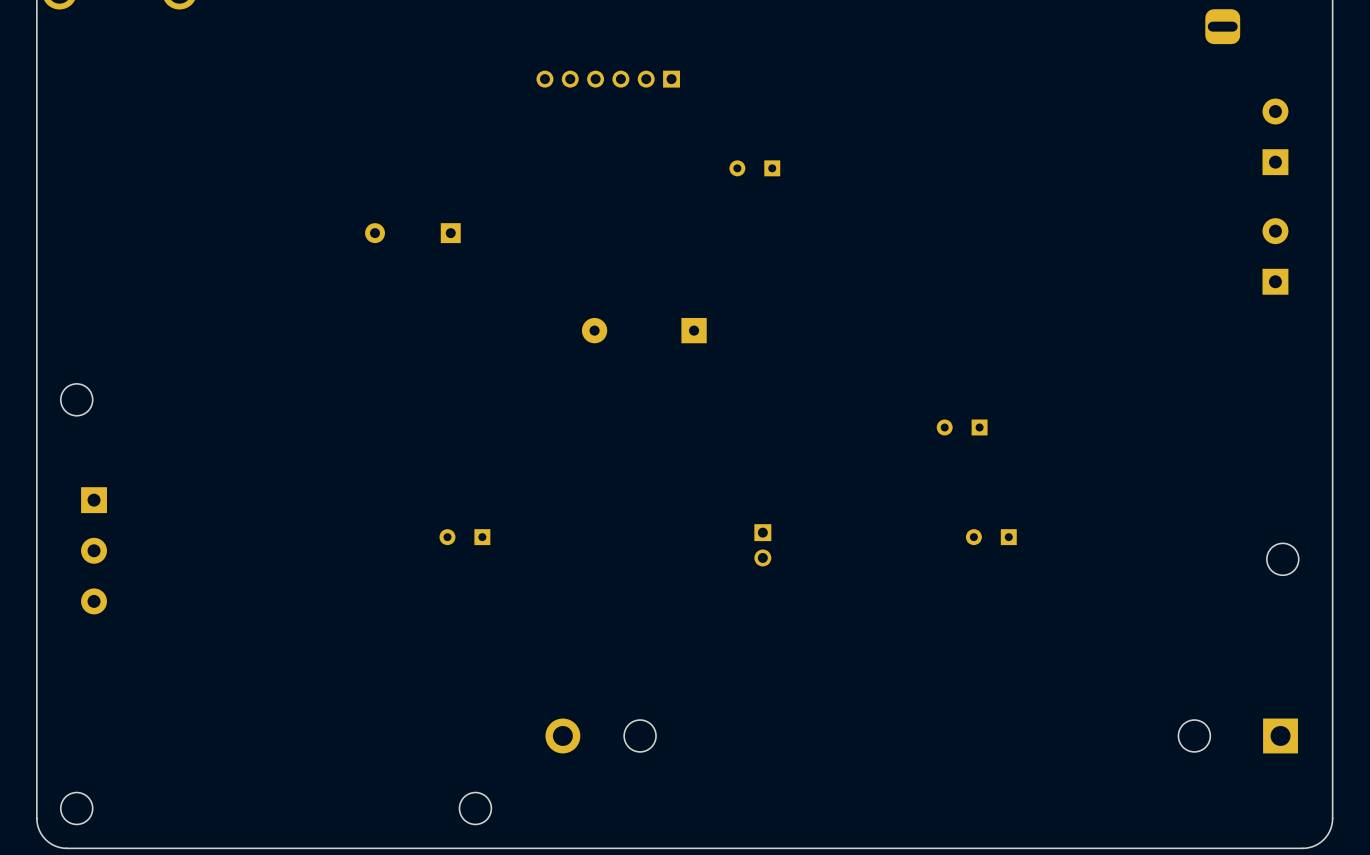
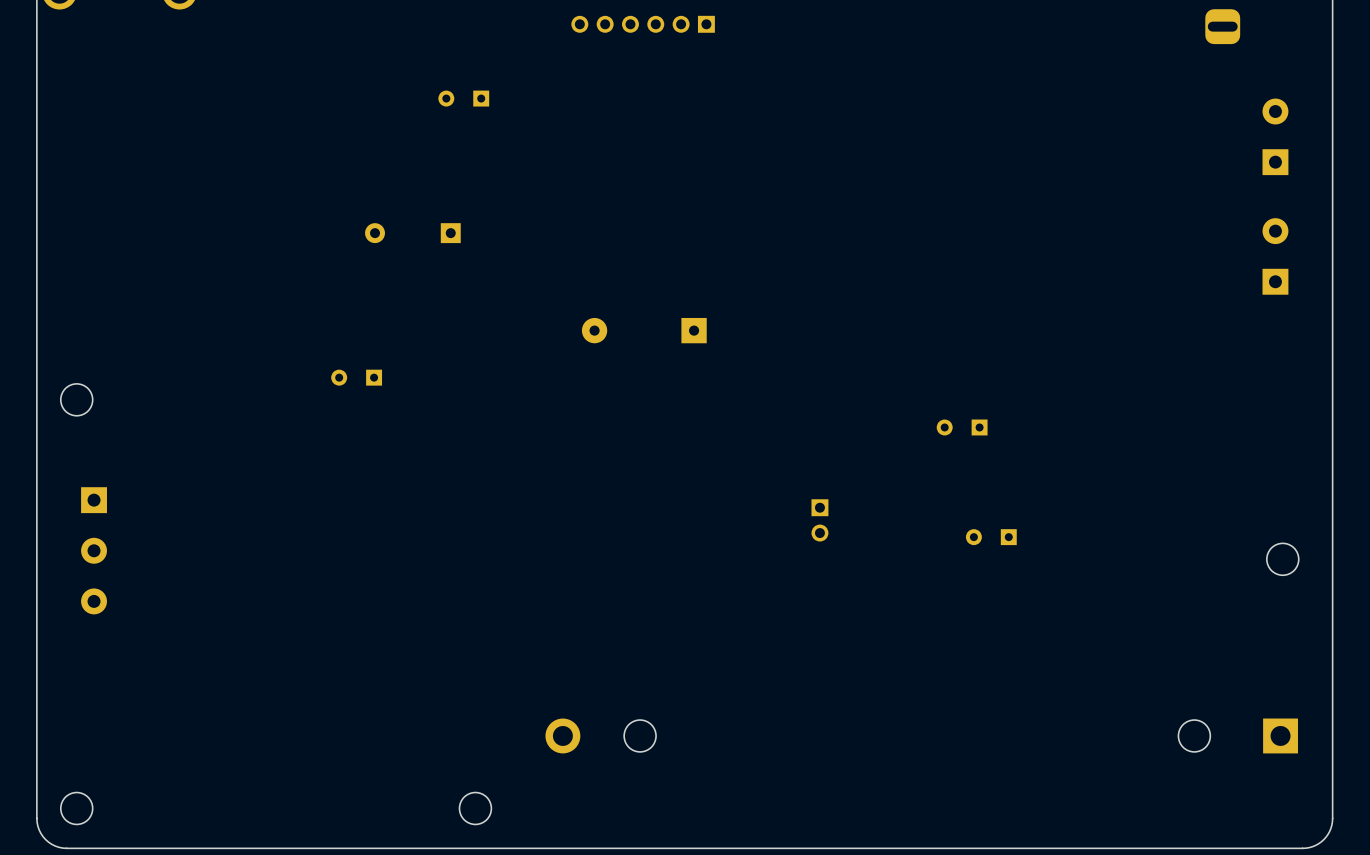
part position: (608, 79) -> (643, 24)
part: none -> (463, 98)
part: (754, 168) -> none
part position: (464, 537) -> (356, 377)
part position: (762, 545) -> (819, 520)

